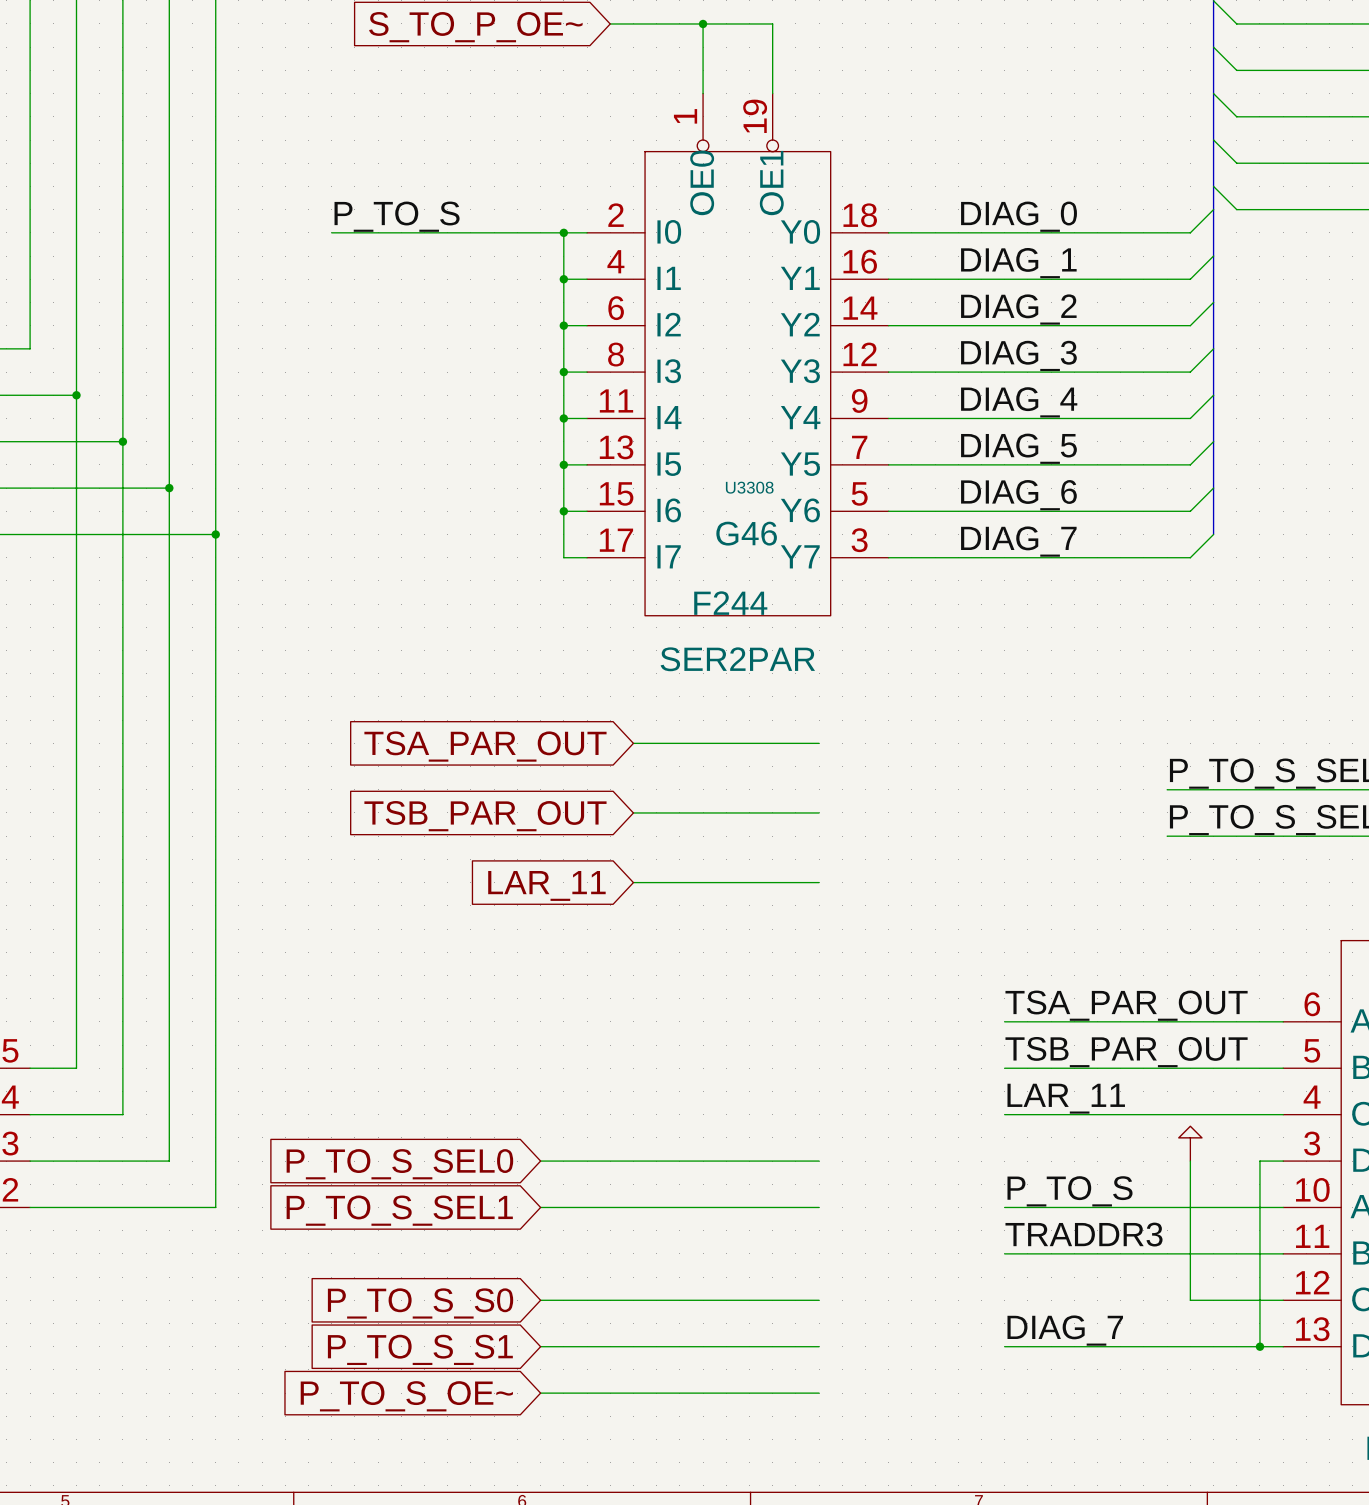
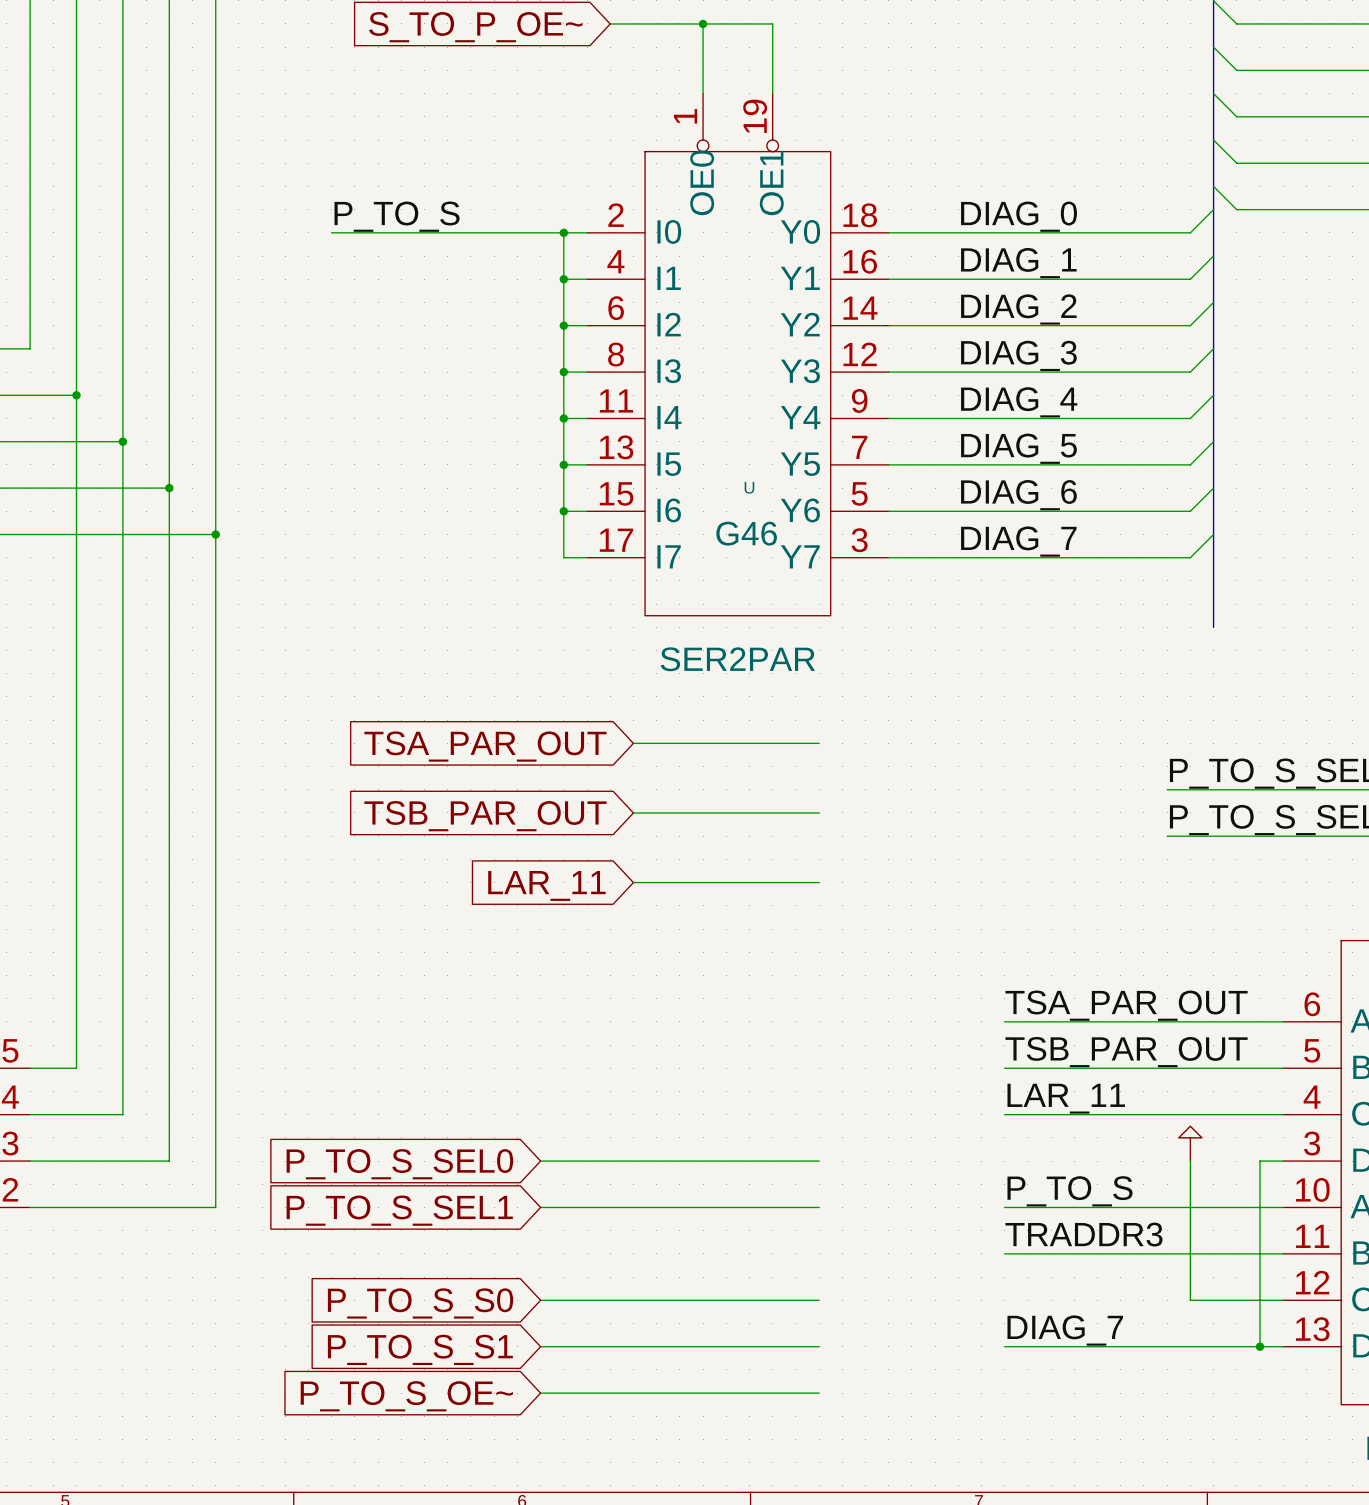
U3308 name: U3308 (749, 487) -> U (749, 487)
bus: none -> (1213, 534) (1213, 627)
U3308 value: F244 (730, 603) -> none

